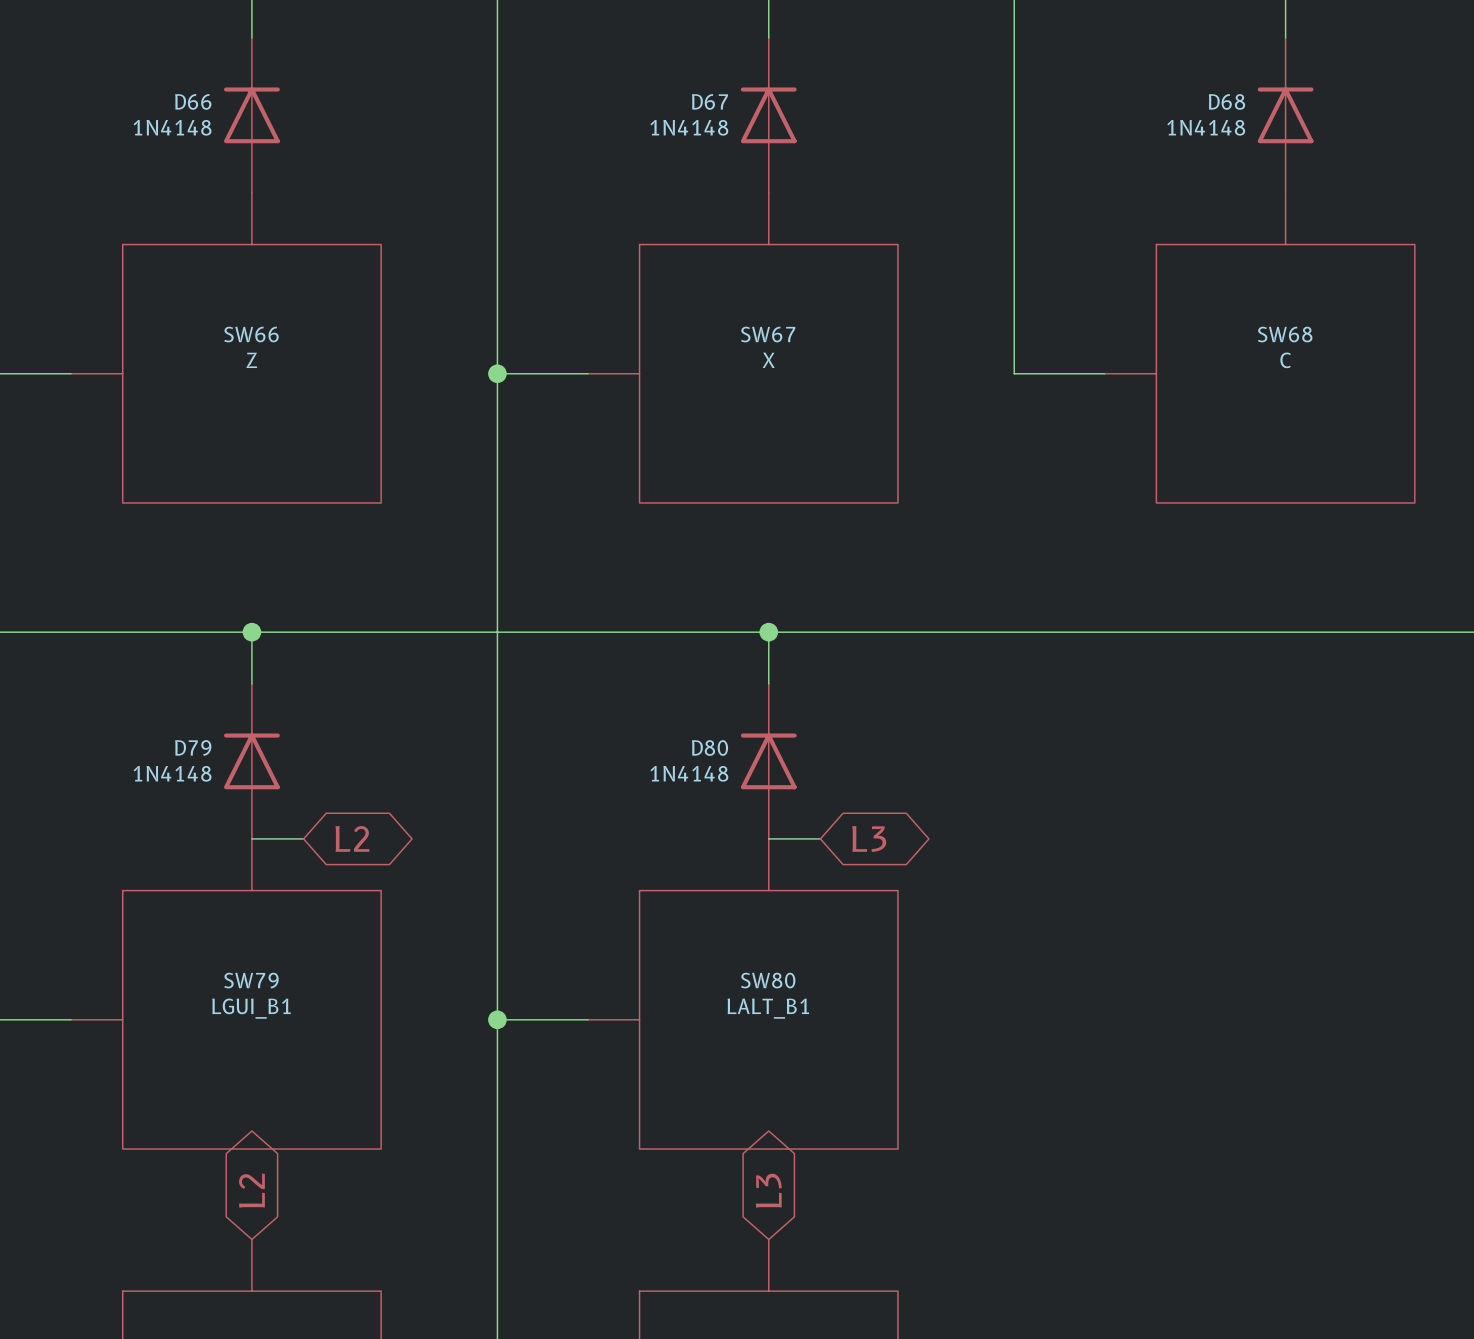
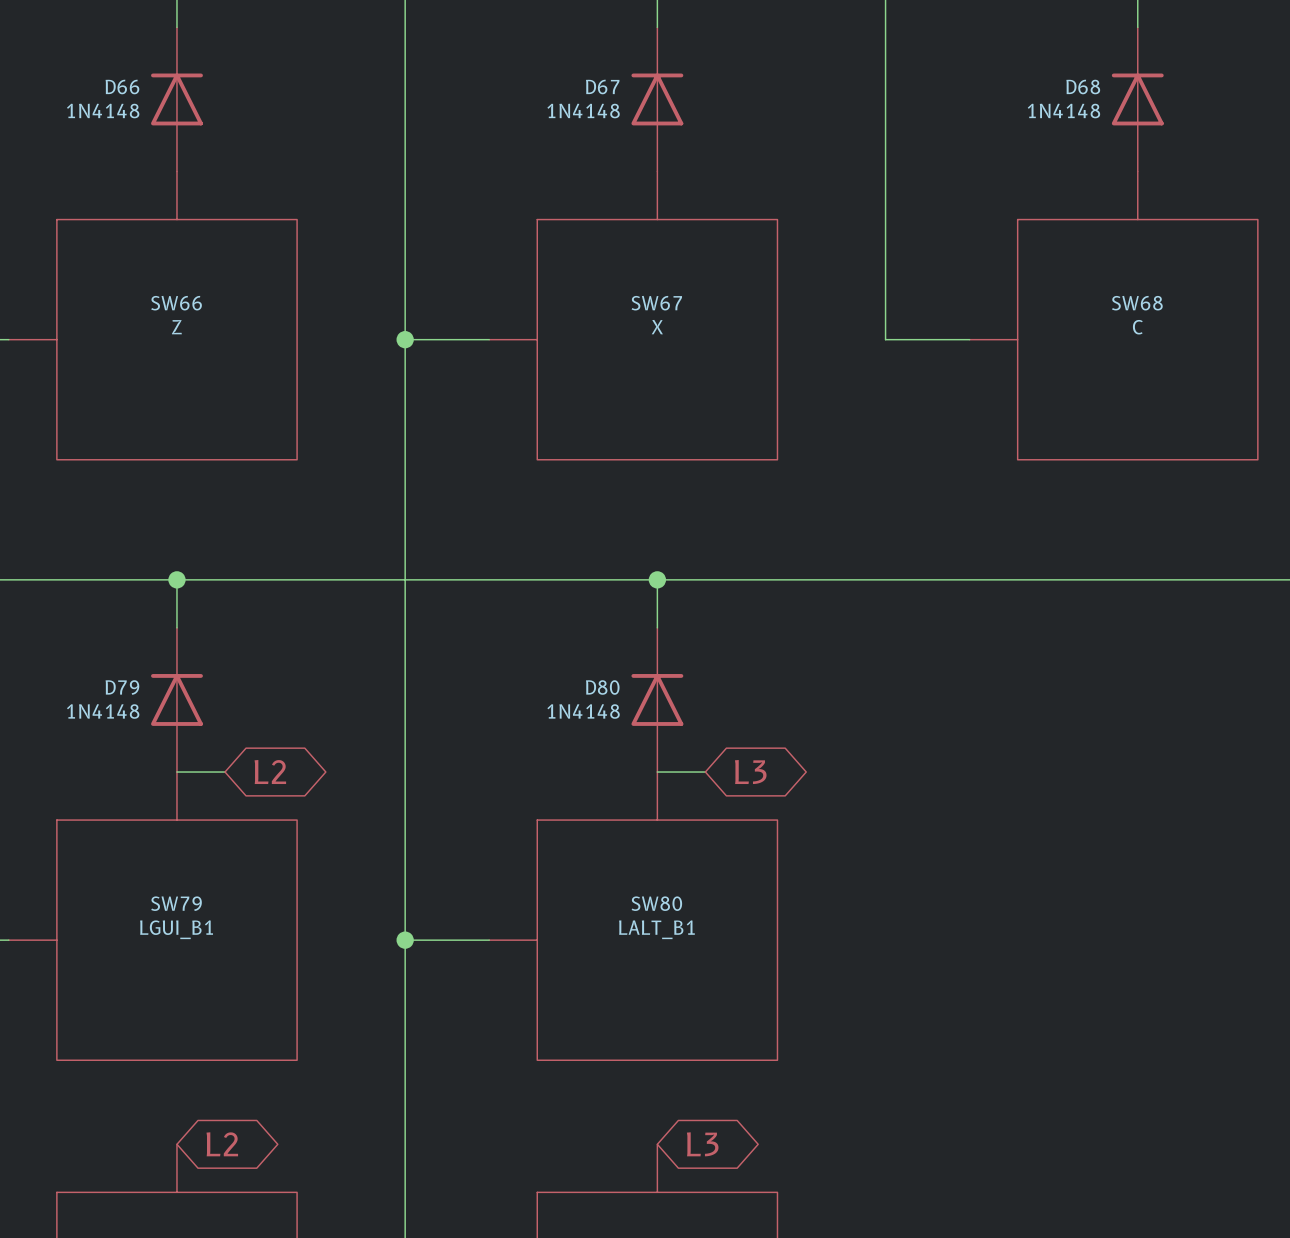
global label rotation: 0° (251, 1190) -> 90° clockwise (222, 1144)
global label rotation: 0° (768, 1190) -> 90° clockwise (702, 1144)

